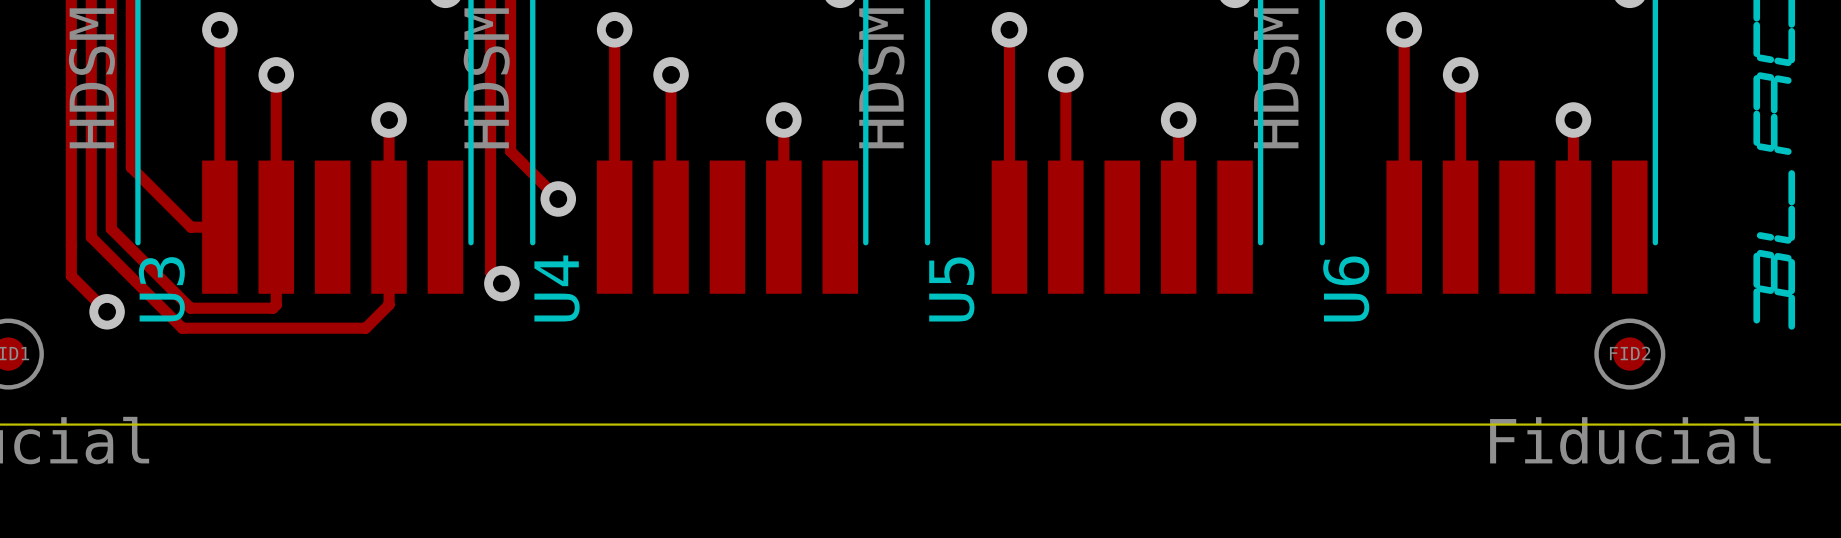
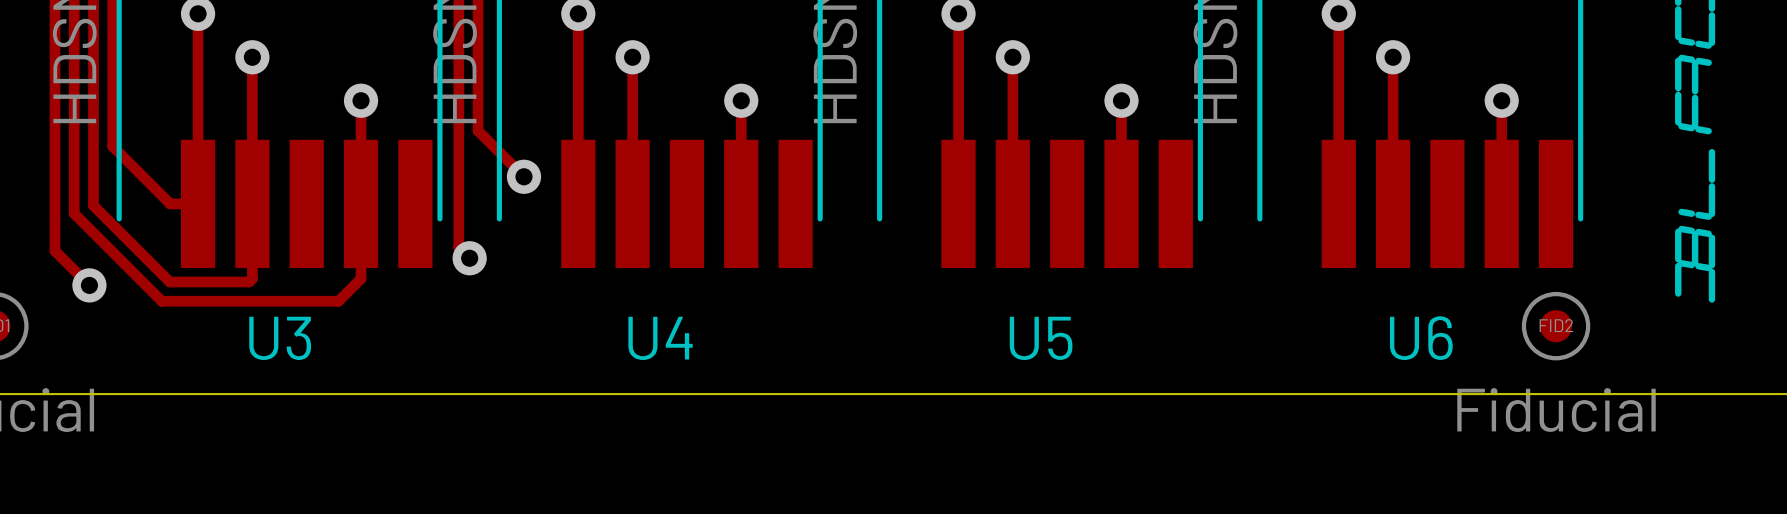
U4 name rotation: 0° (557, 288) -> 90° clockwise (660, 338)
U4 name position: U4 (557, 288) -> U4 (660, 338)
U3 name rotation: 0° (161, 289) -> 90° clockwise (280, 338)
U3 name position: U3 (161, 289) -> U3 (280, 338)
U5 name rotation: 0° (951, 289) -> 90° clockwise (1041, 338)
U5 name position: U5 (951, 289) -> U5 (1041, 338)
U6 name rotation: 0° (1346, 289) -> 90° clockwise (1421, 338)
U6 name position: U6 (1346, 289) -> U6 (1421, 338)

